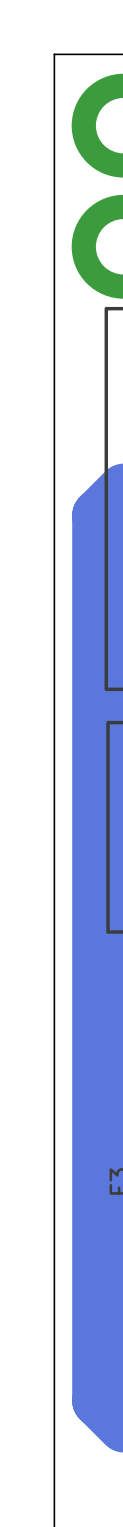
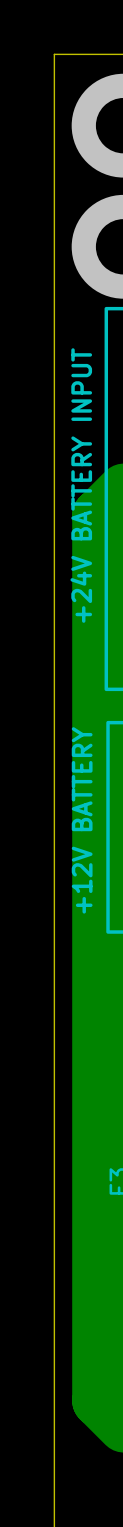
text: none -> +24V BATTERY INPUT (81, 485)
text: none -> +12V BATTERY (82, 820)

